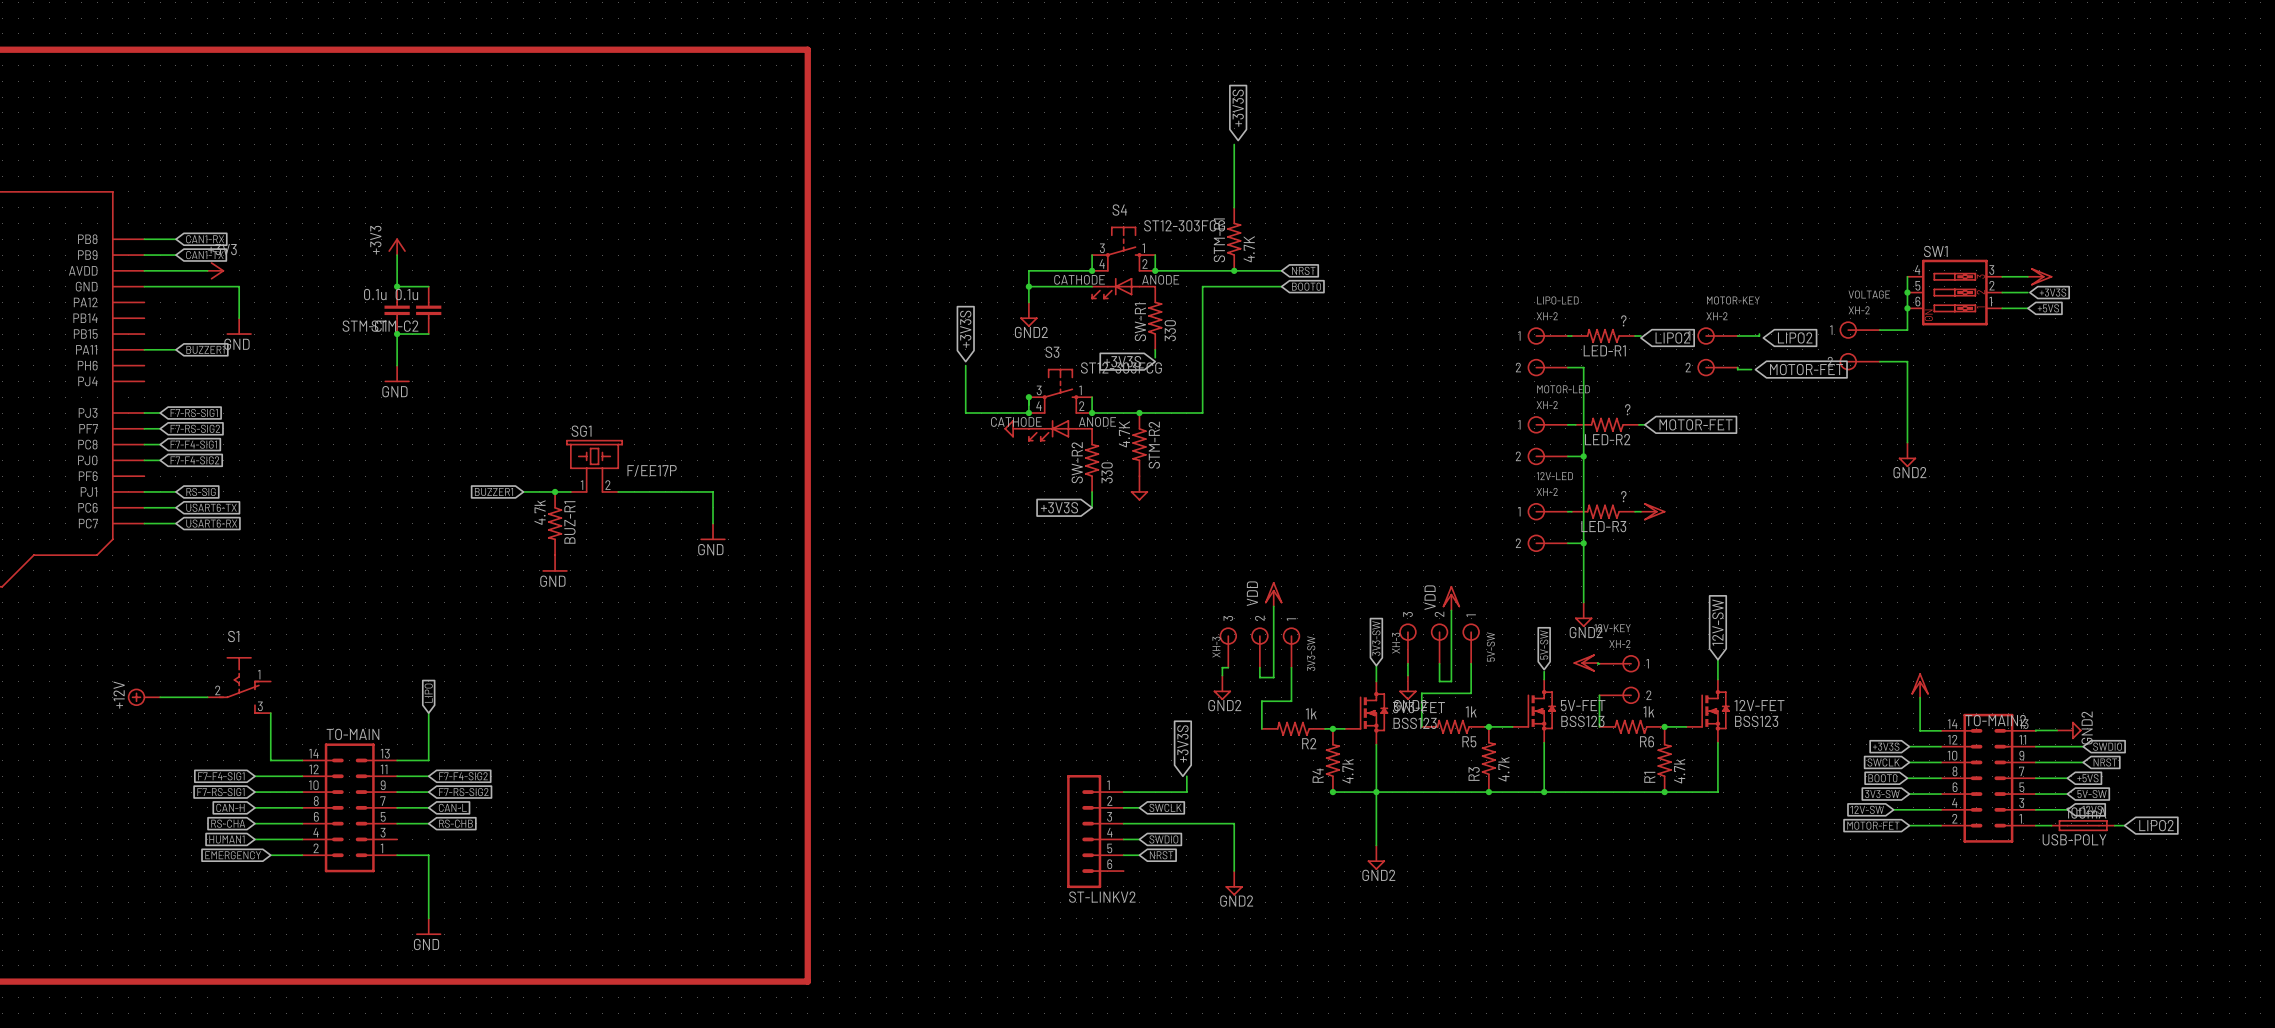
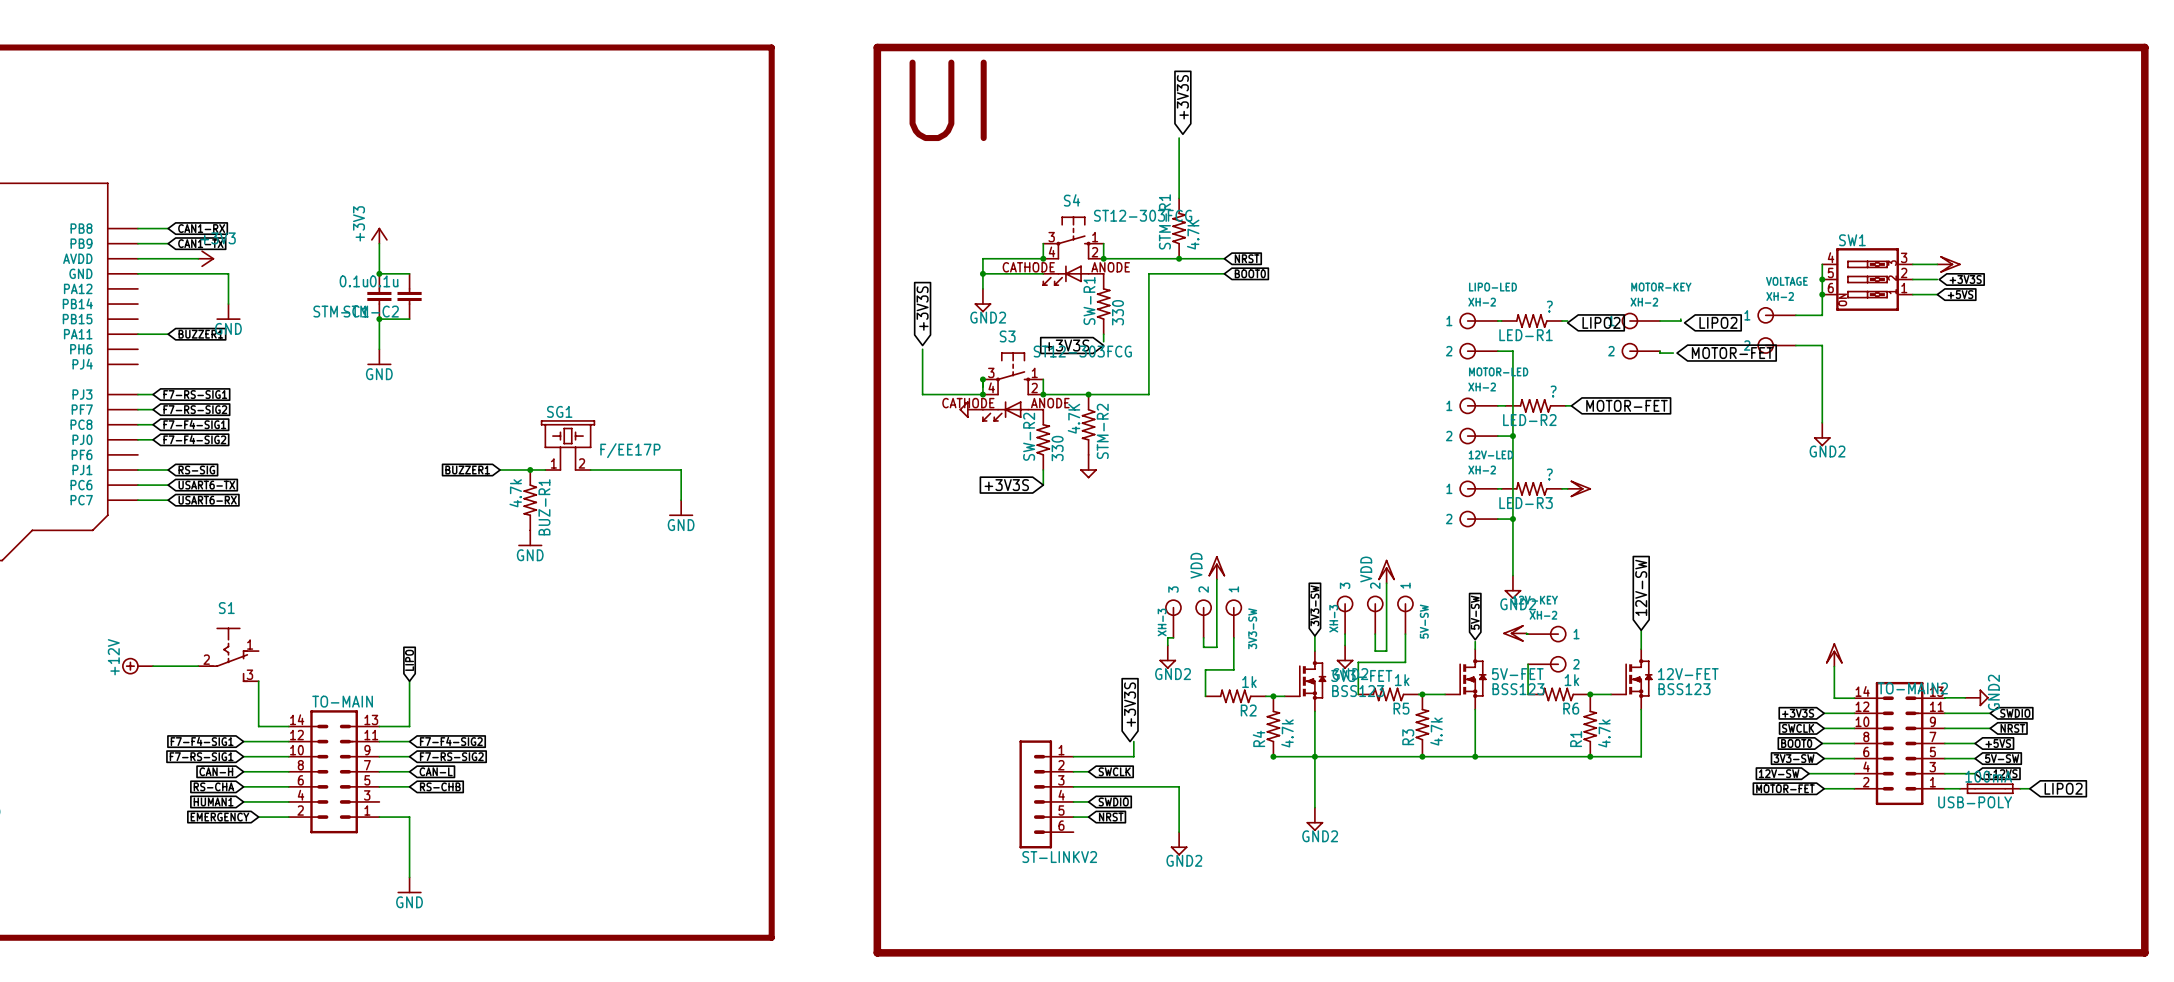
line: none -> (877, 47) (2144, 47) (2144, 952) (877, 952) (877, 47)
text: none -> UI (948, 100)

